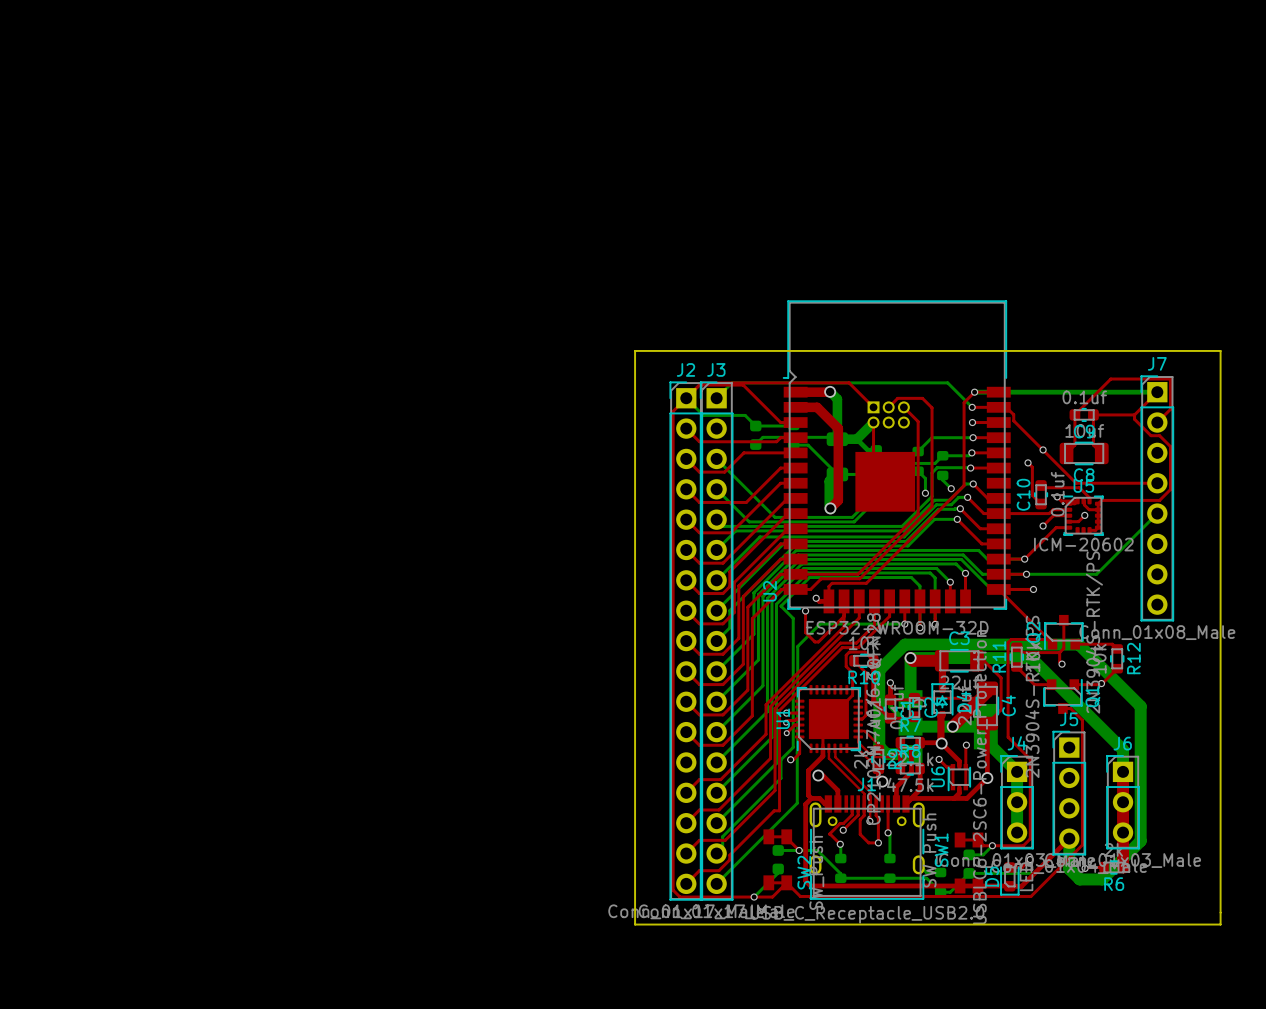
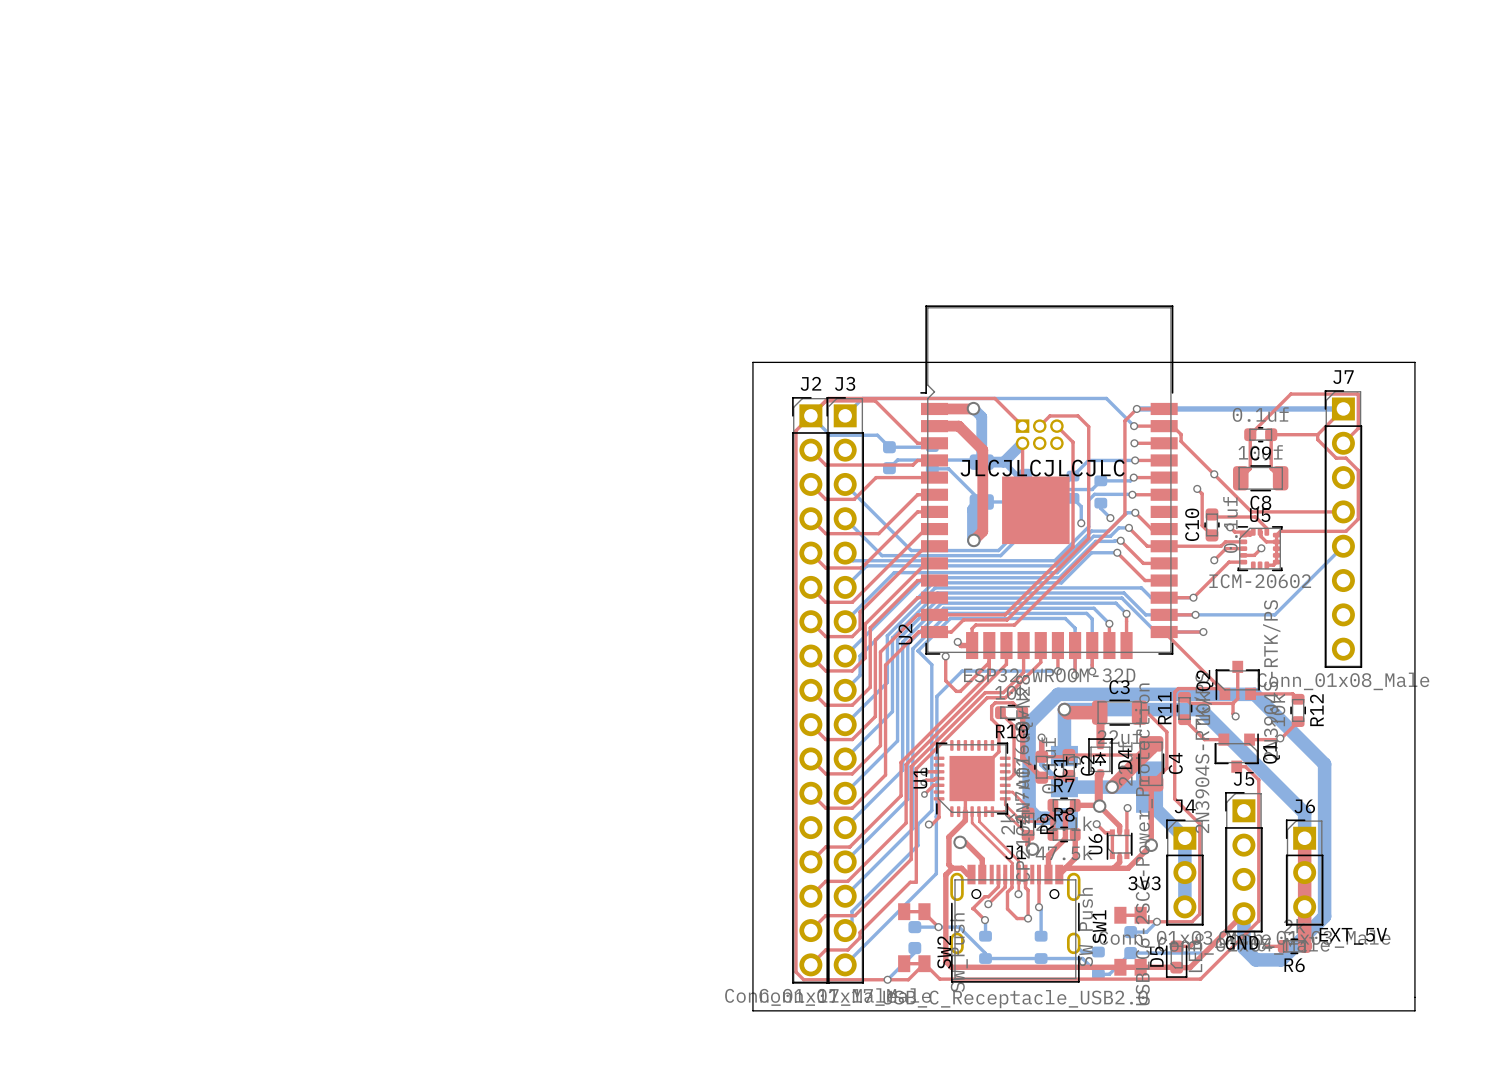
text: none -> JLCJLCJLCJLC (1042, 468)
text: none -> 3V3 (1144, 883)
text: none -> EXT_5V (1353, 936)
text: none -> GND (1242, 942)

